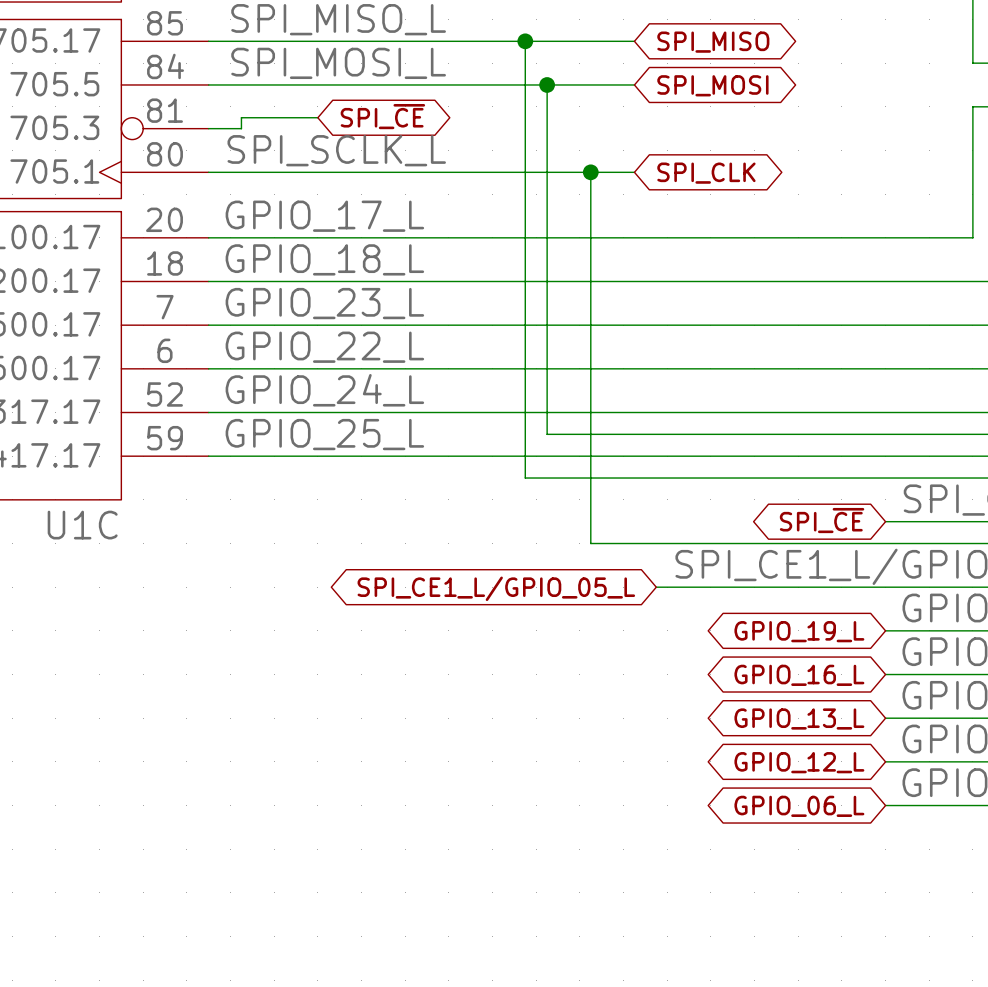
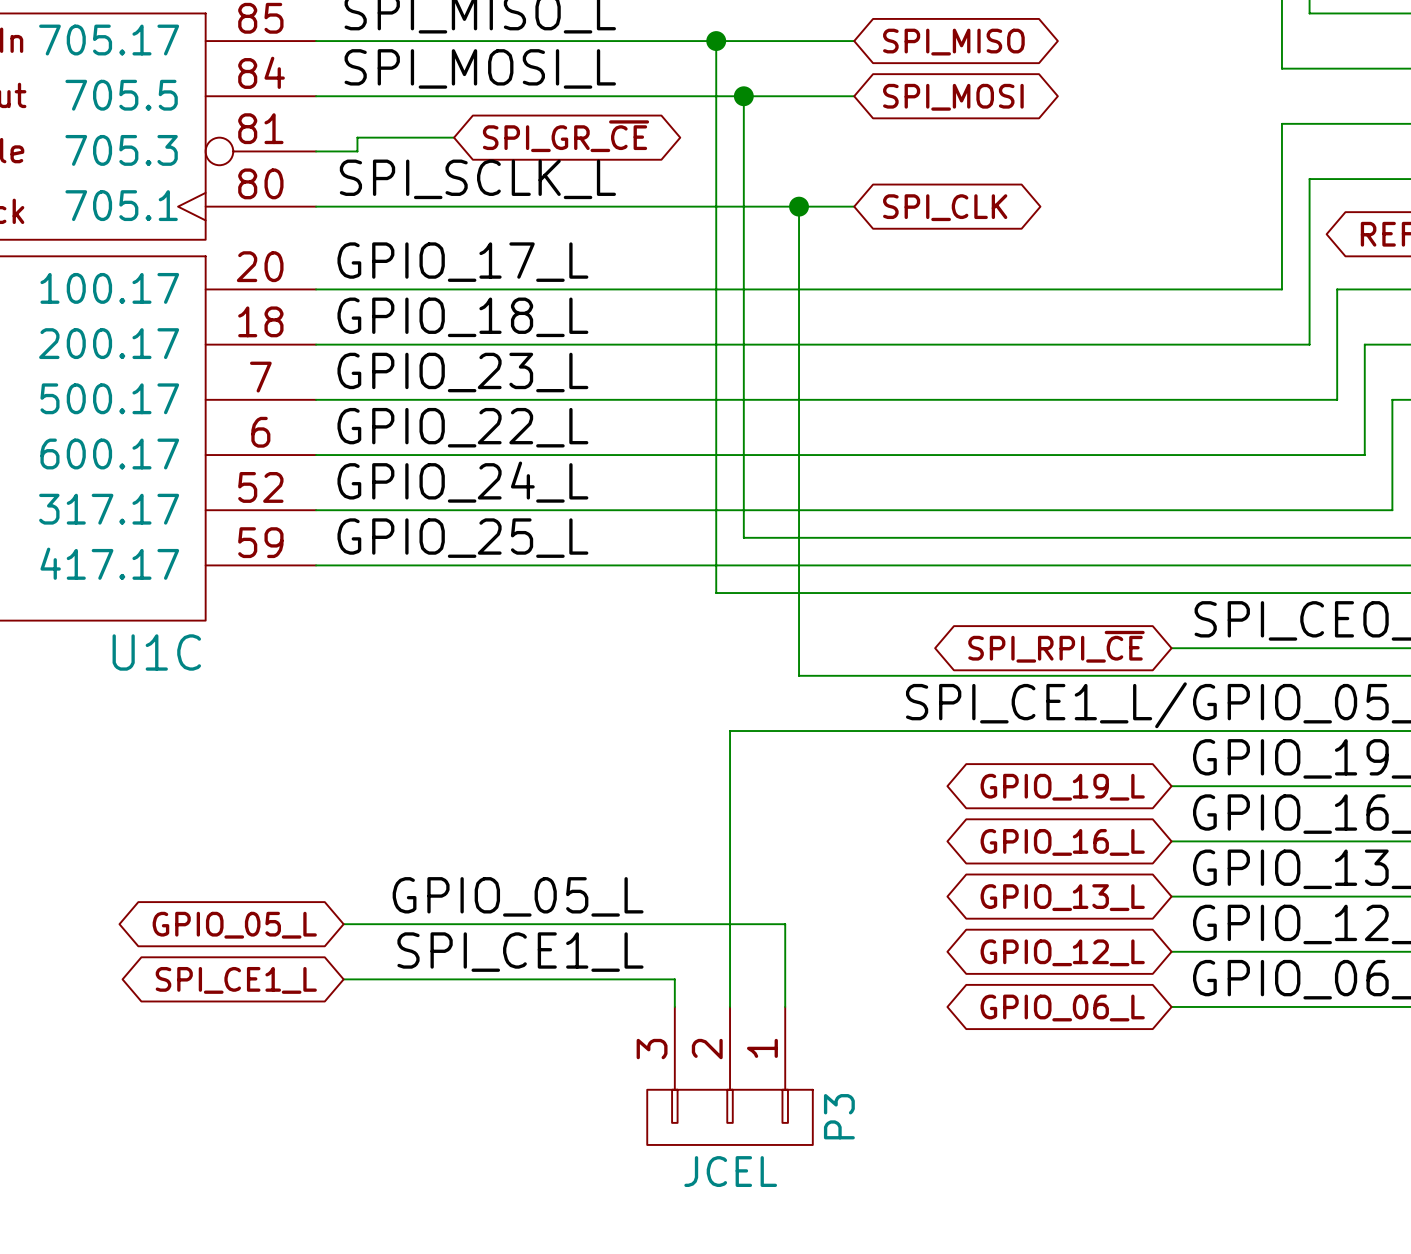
global label: SPI_~{CE} (382, 116) -> SPI_GR_~{CE} (565, 136)
global label: SPI_~{CE} (822, 520) -> SPI_RPI_~{CE} (1056, 646)
wire: none -> (881, 731) (730, 731) (730, 1006)
global label: SPI_CE1_L/GPIO_05_L (496, 588) -> none
label: none -> GPIO_05_L (518, 896)
global label: none -> GPIO_05_L (234, 925)
wire: none -> (343, 924) (785, 924) (785, 1006)
label: none -> SPI_CE1_L (520, 952)
wire: none -> (343, 979) (674, 979) (674, 1006)
global label: none -> SPI_CE1_L (236, 980)
P3: none -> JCEL (730, 1075)

